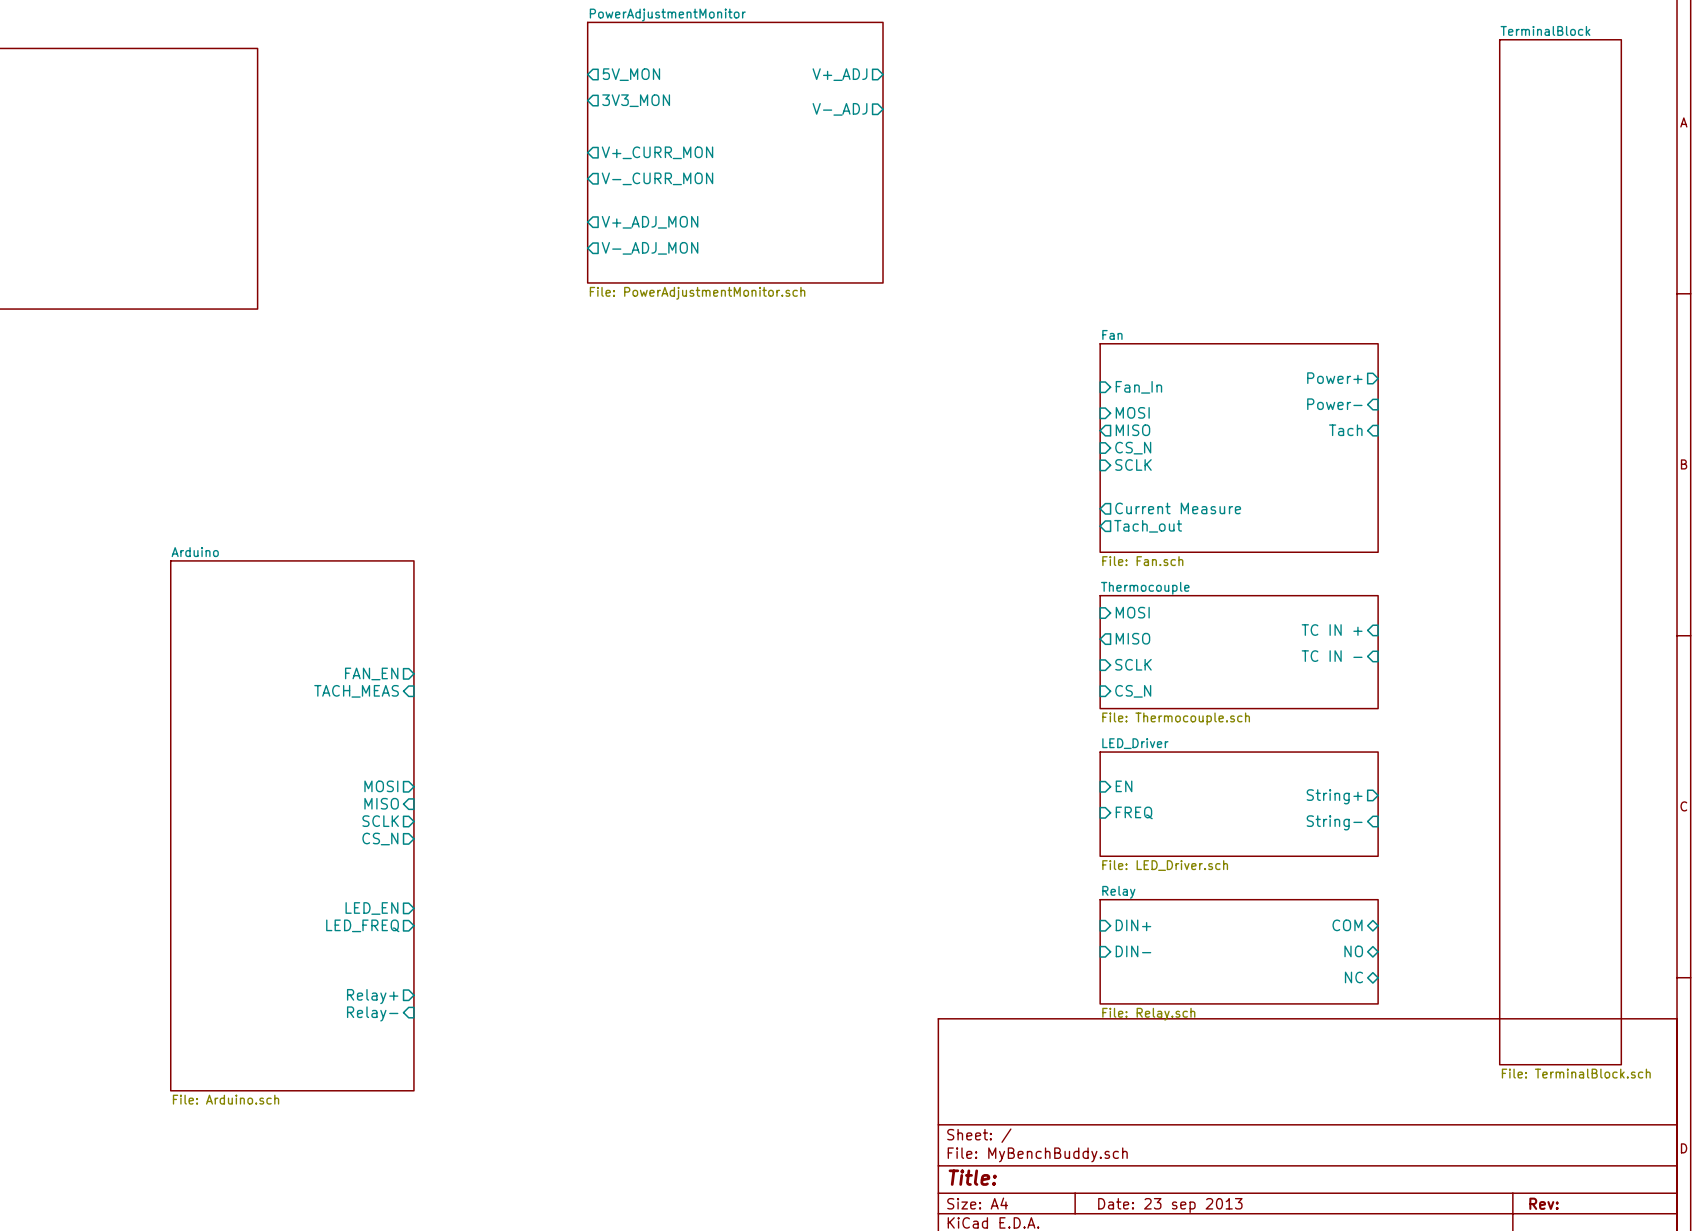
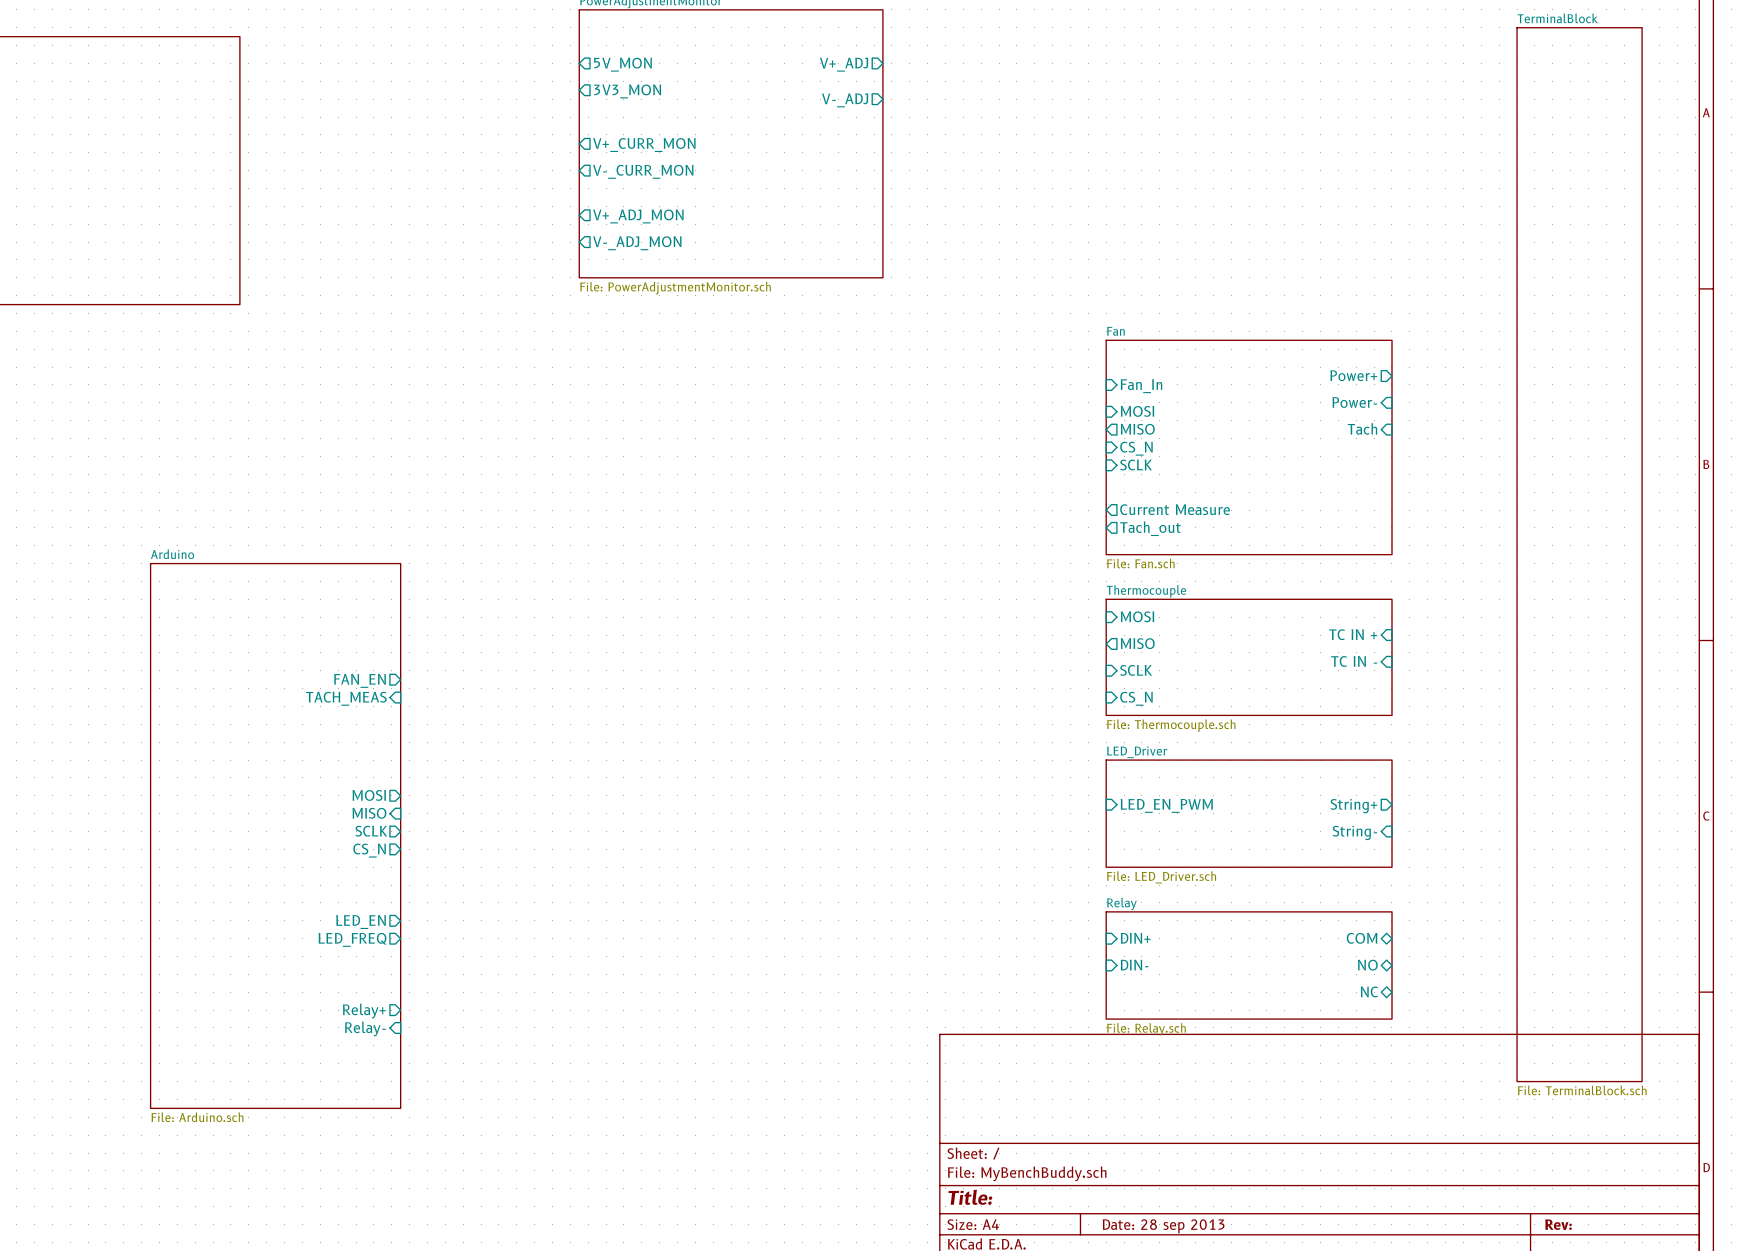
sheet pin: EN (1124, 786) -> none
sheet pin: none -> LED_EN_PWM (1166, 805)
sheet pin: FREQ (1134, 812) -> none
title block: Date: 23 sep 2013 (1170, 1205) -> Date: 28 sep 2013 (1163, 1226)

